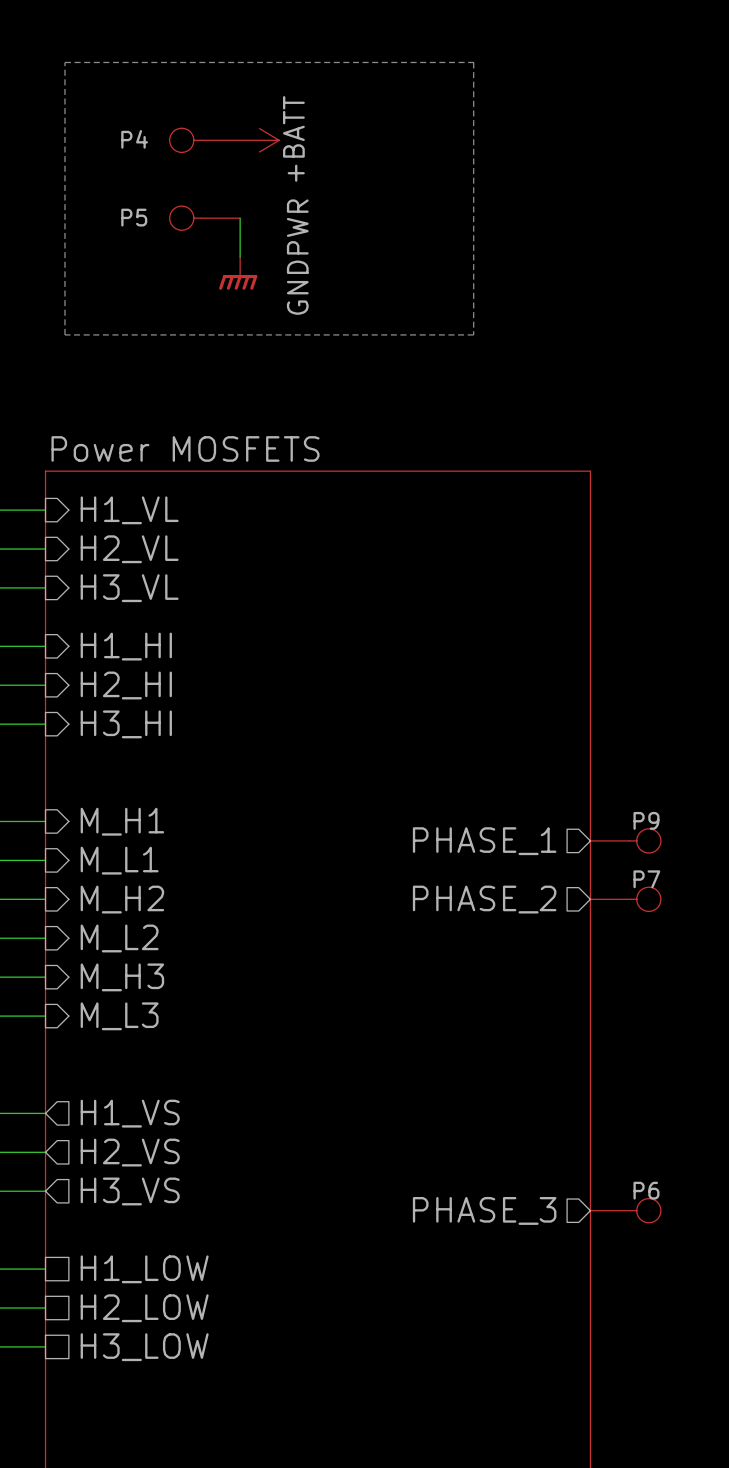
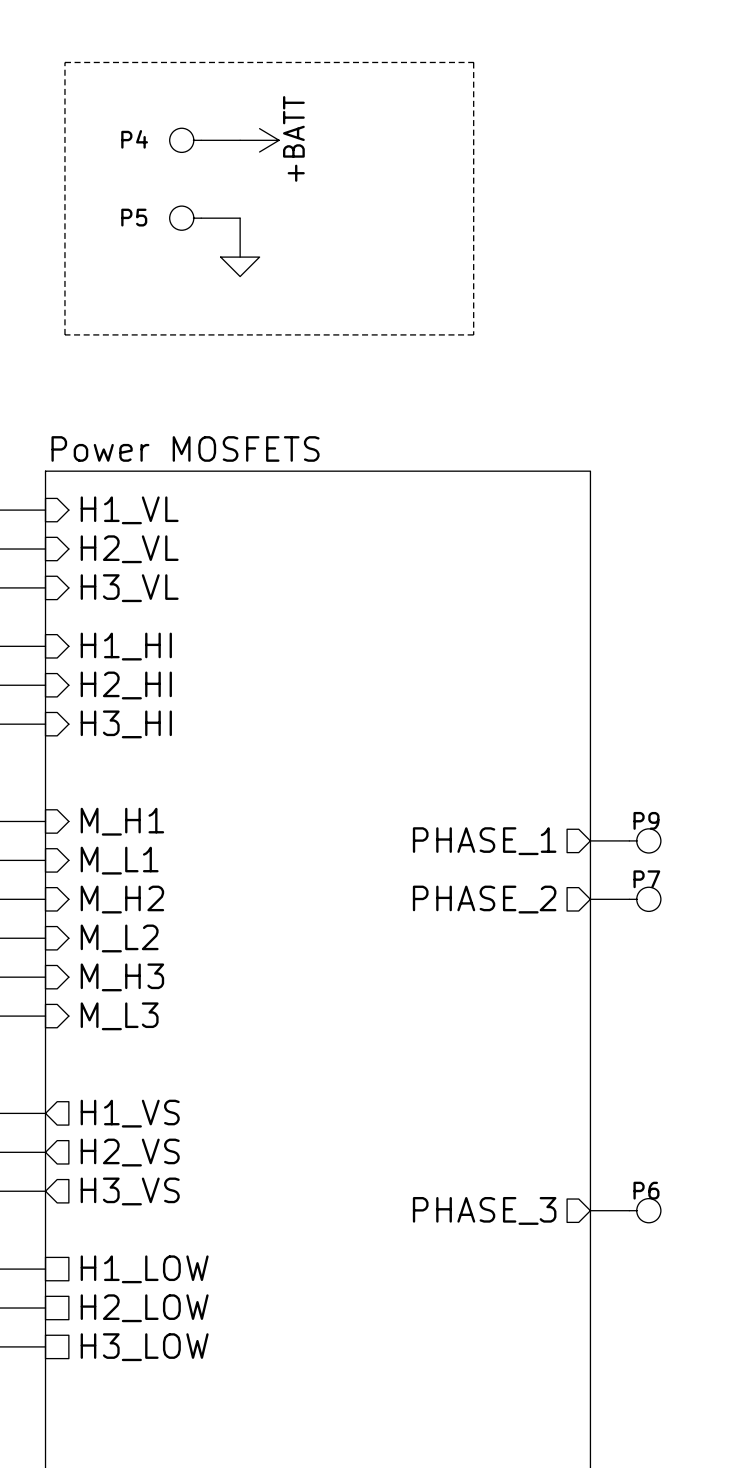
power symbol shape: [219, 257, 258, 290] -> [220, 257, 260, 277]
power symbol text: GNDPWR (297, 257) -> none

